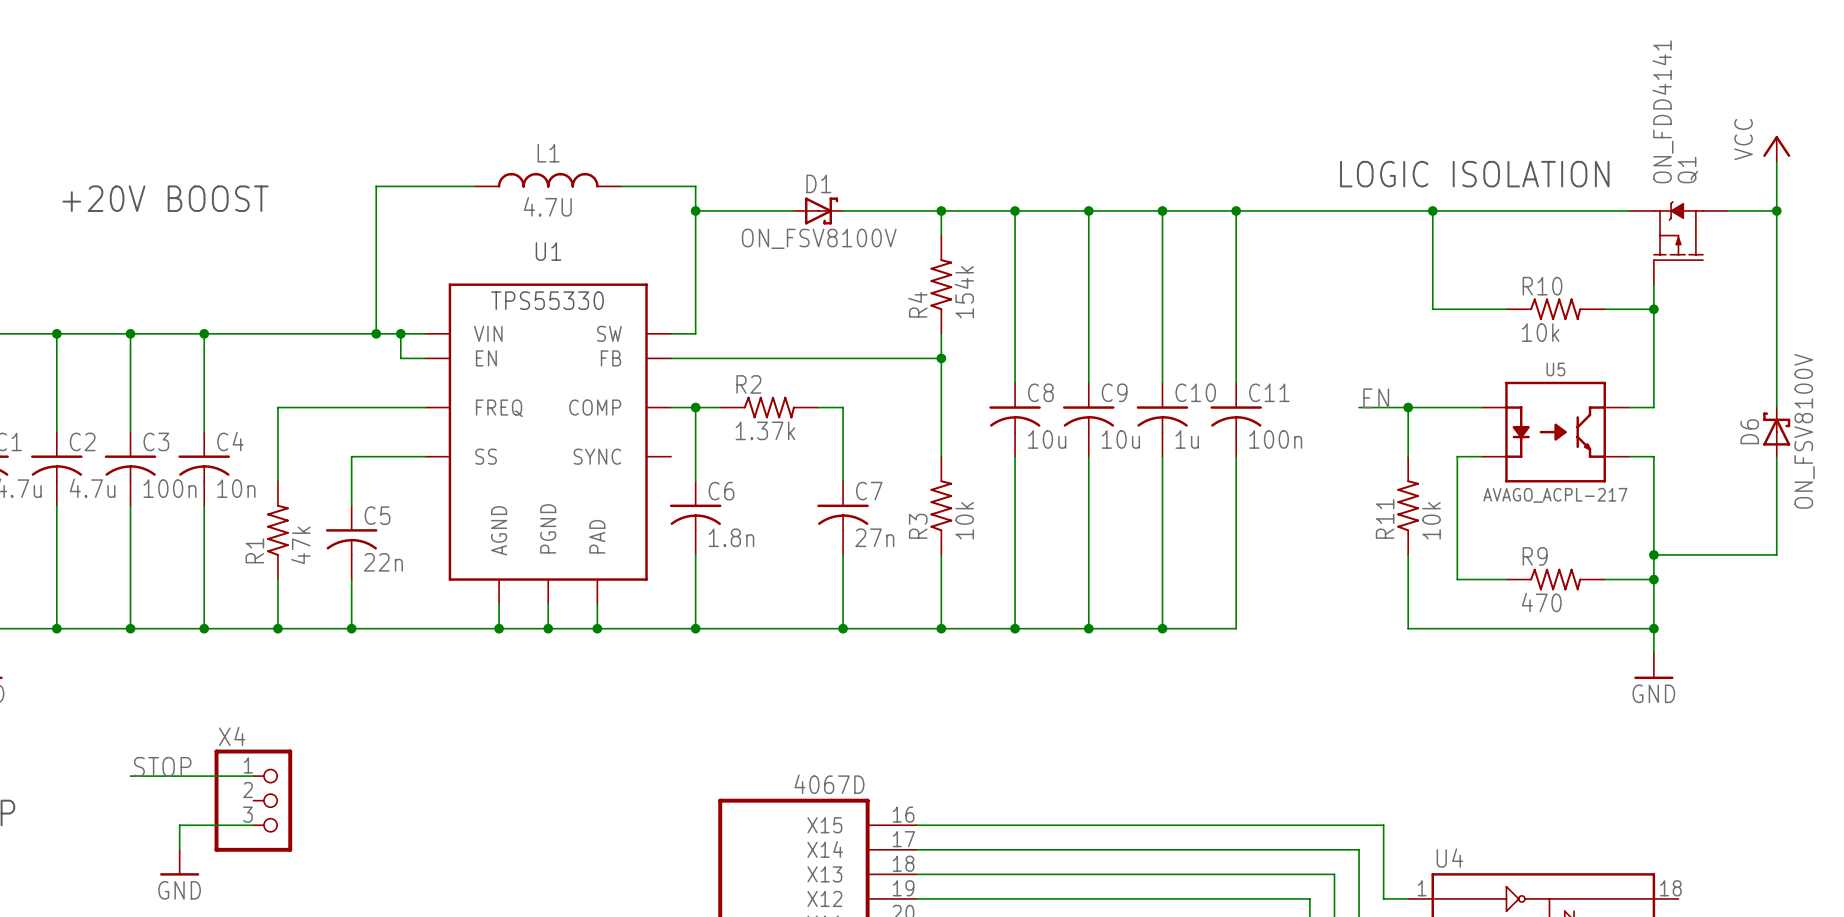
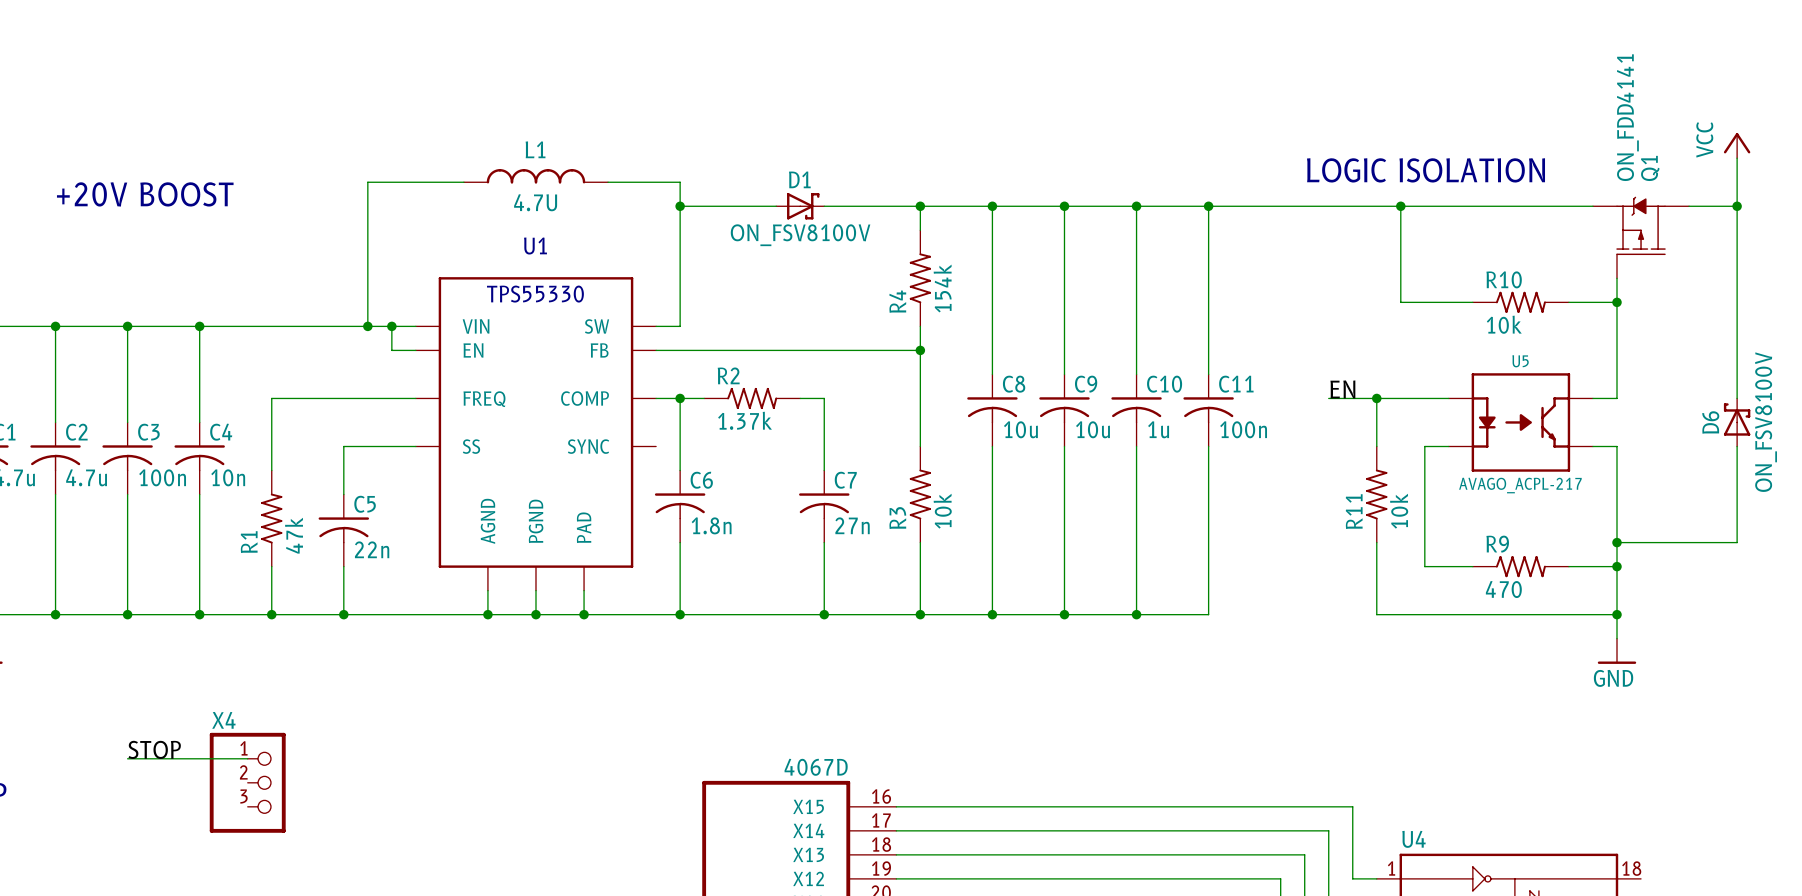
wire: (253, 825) (179, 825) (179, 849) -> none
power symbol: GND (179, 862) -> none

